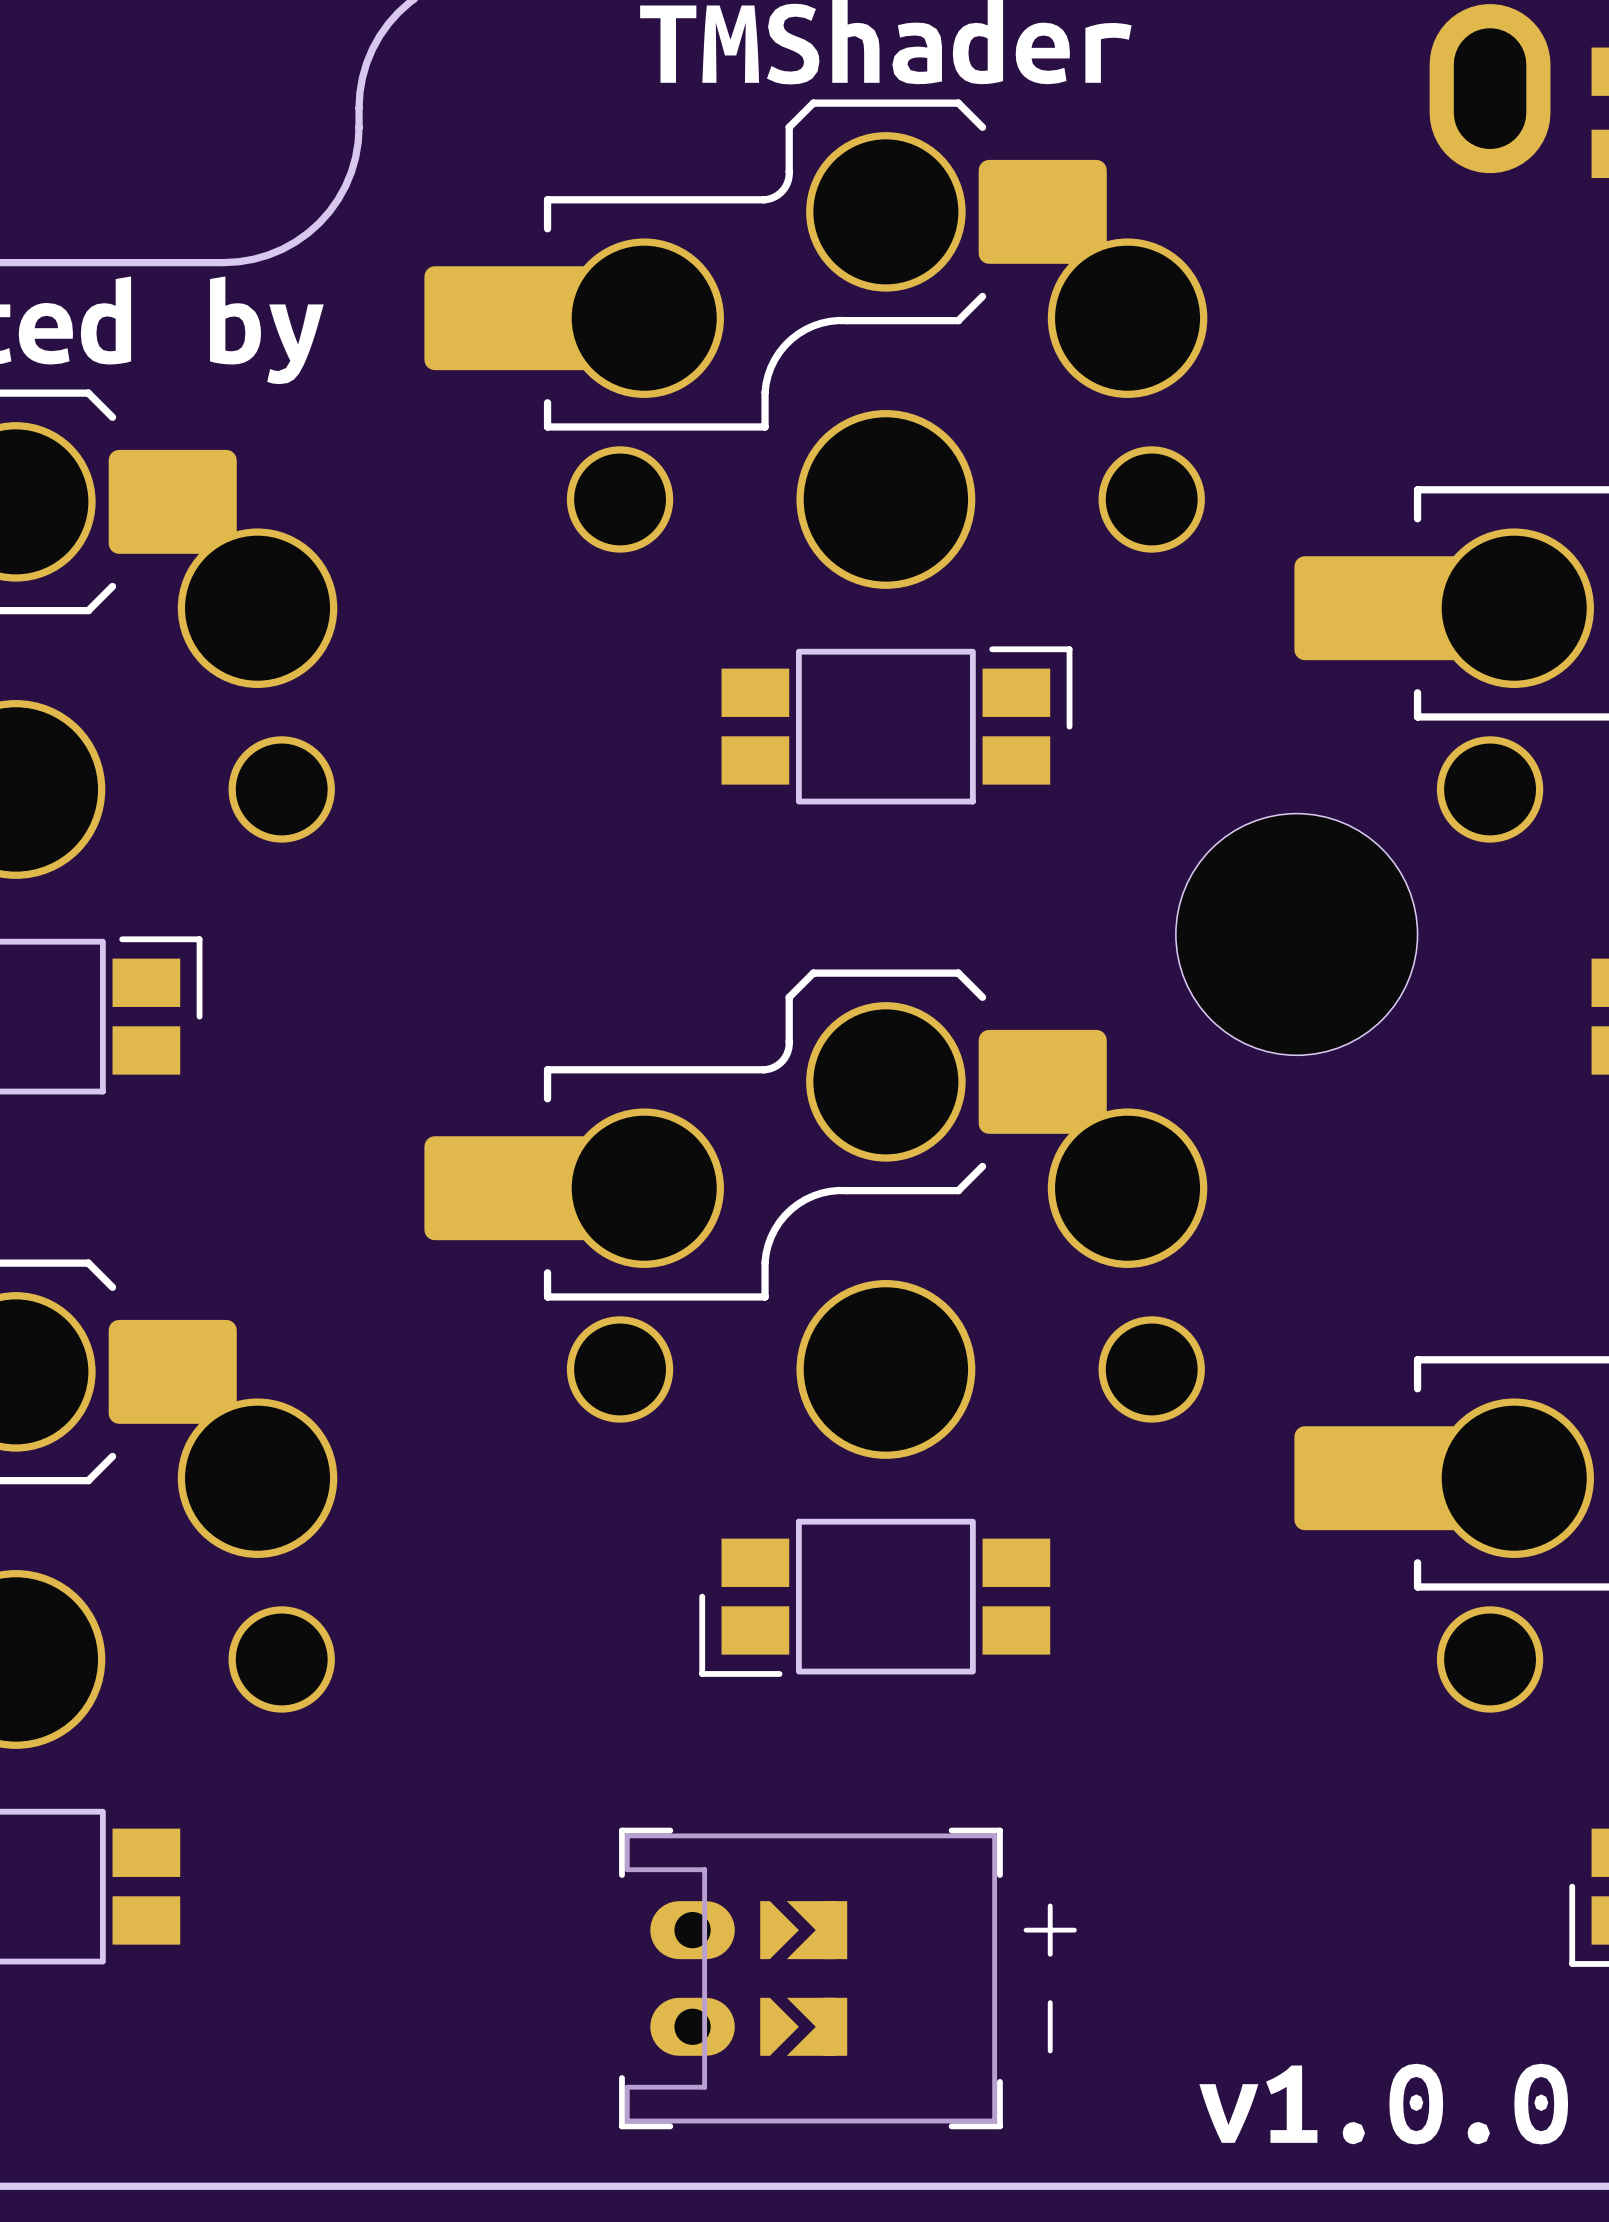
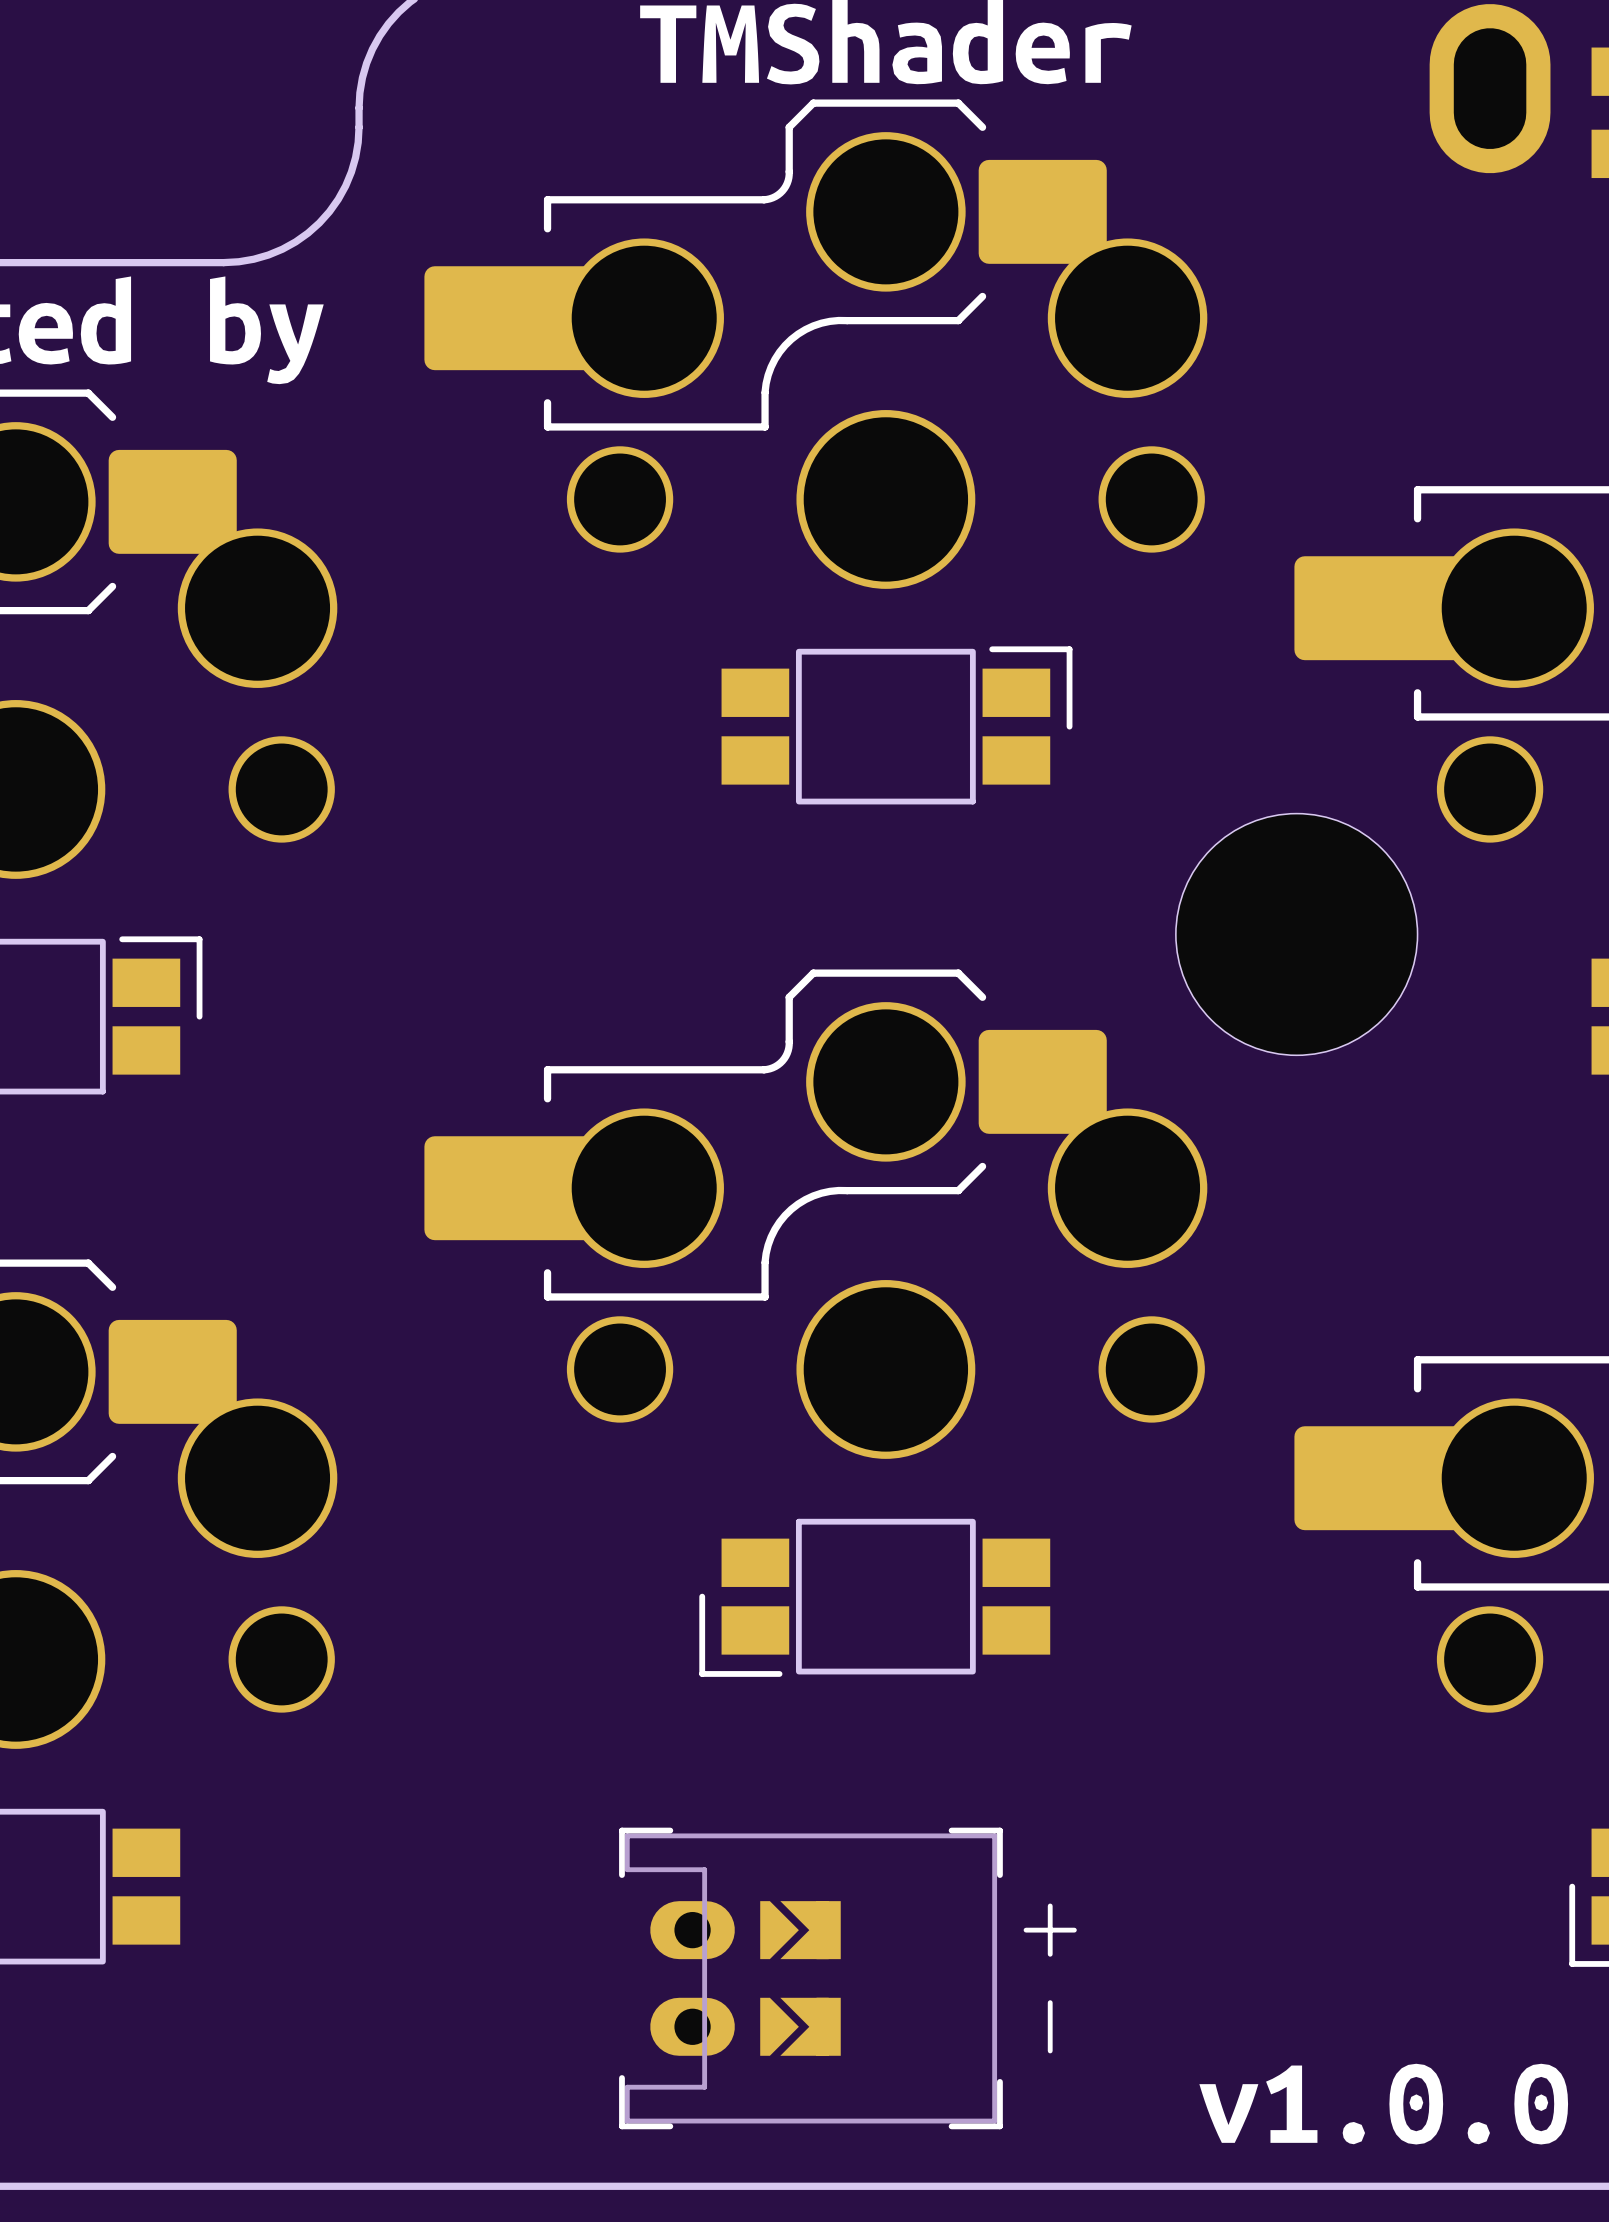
part footprint: [619, 1827, 1077, 2130] -> [619, 1827, 1077, 2130]

